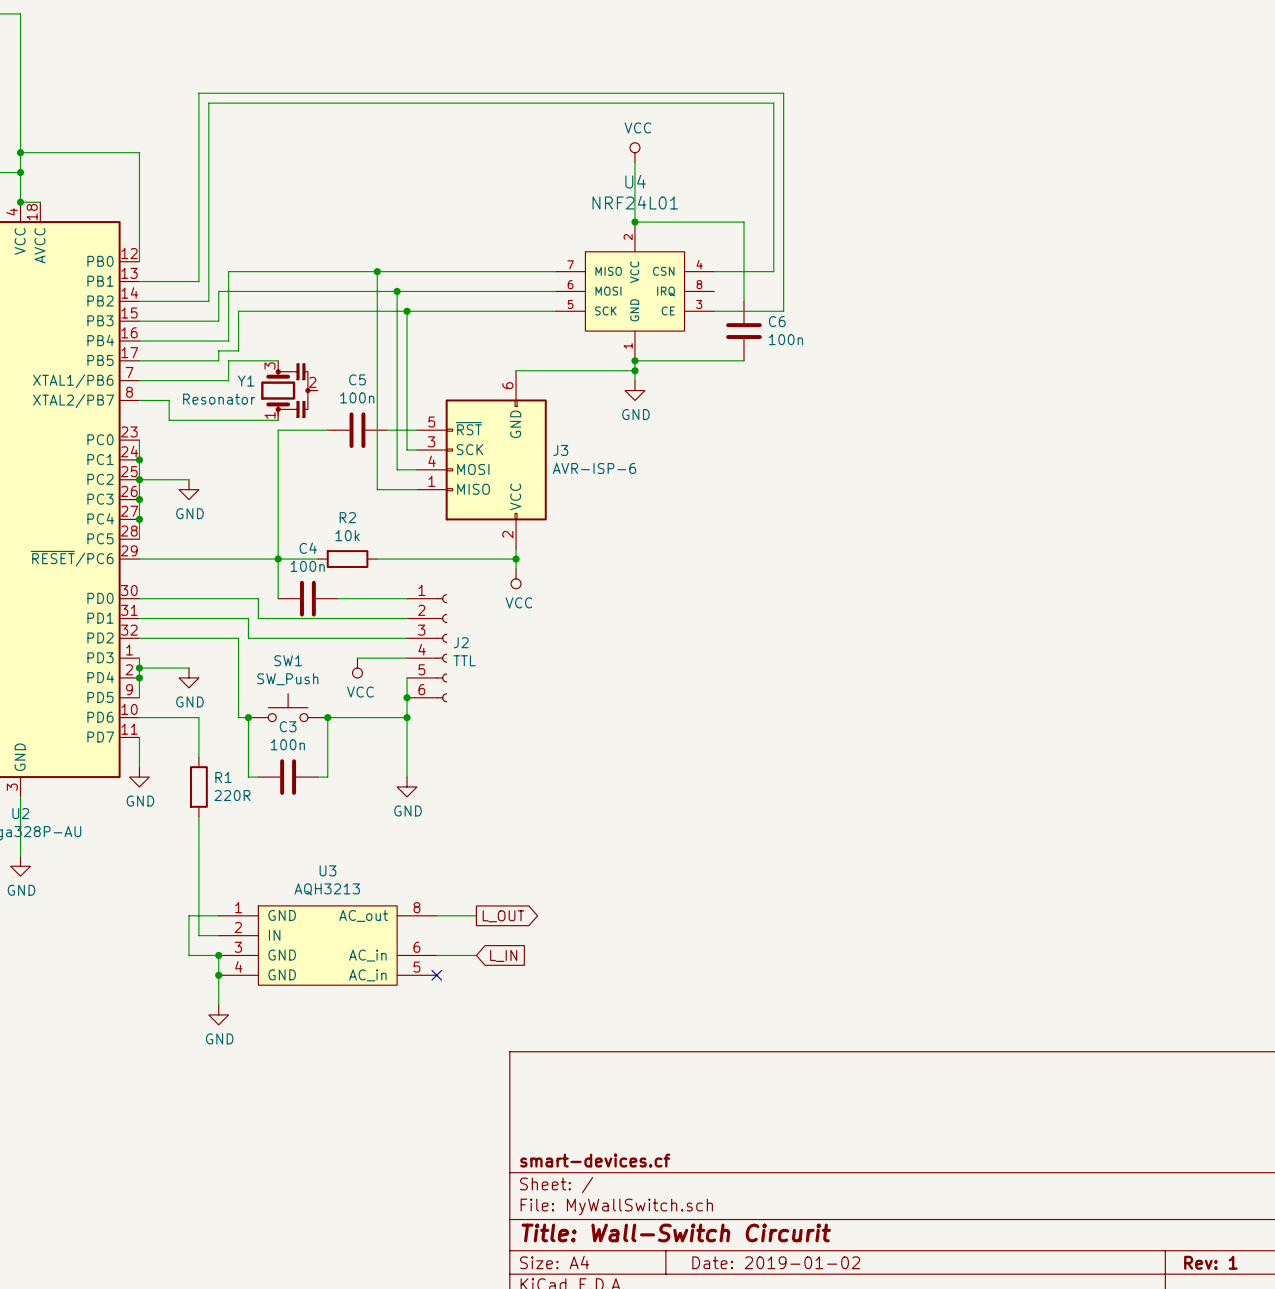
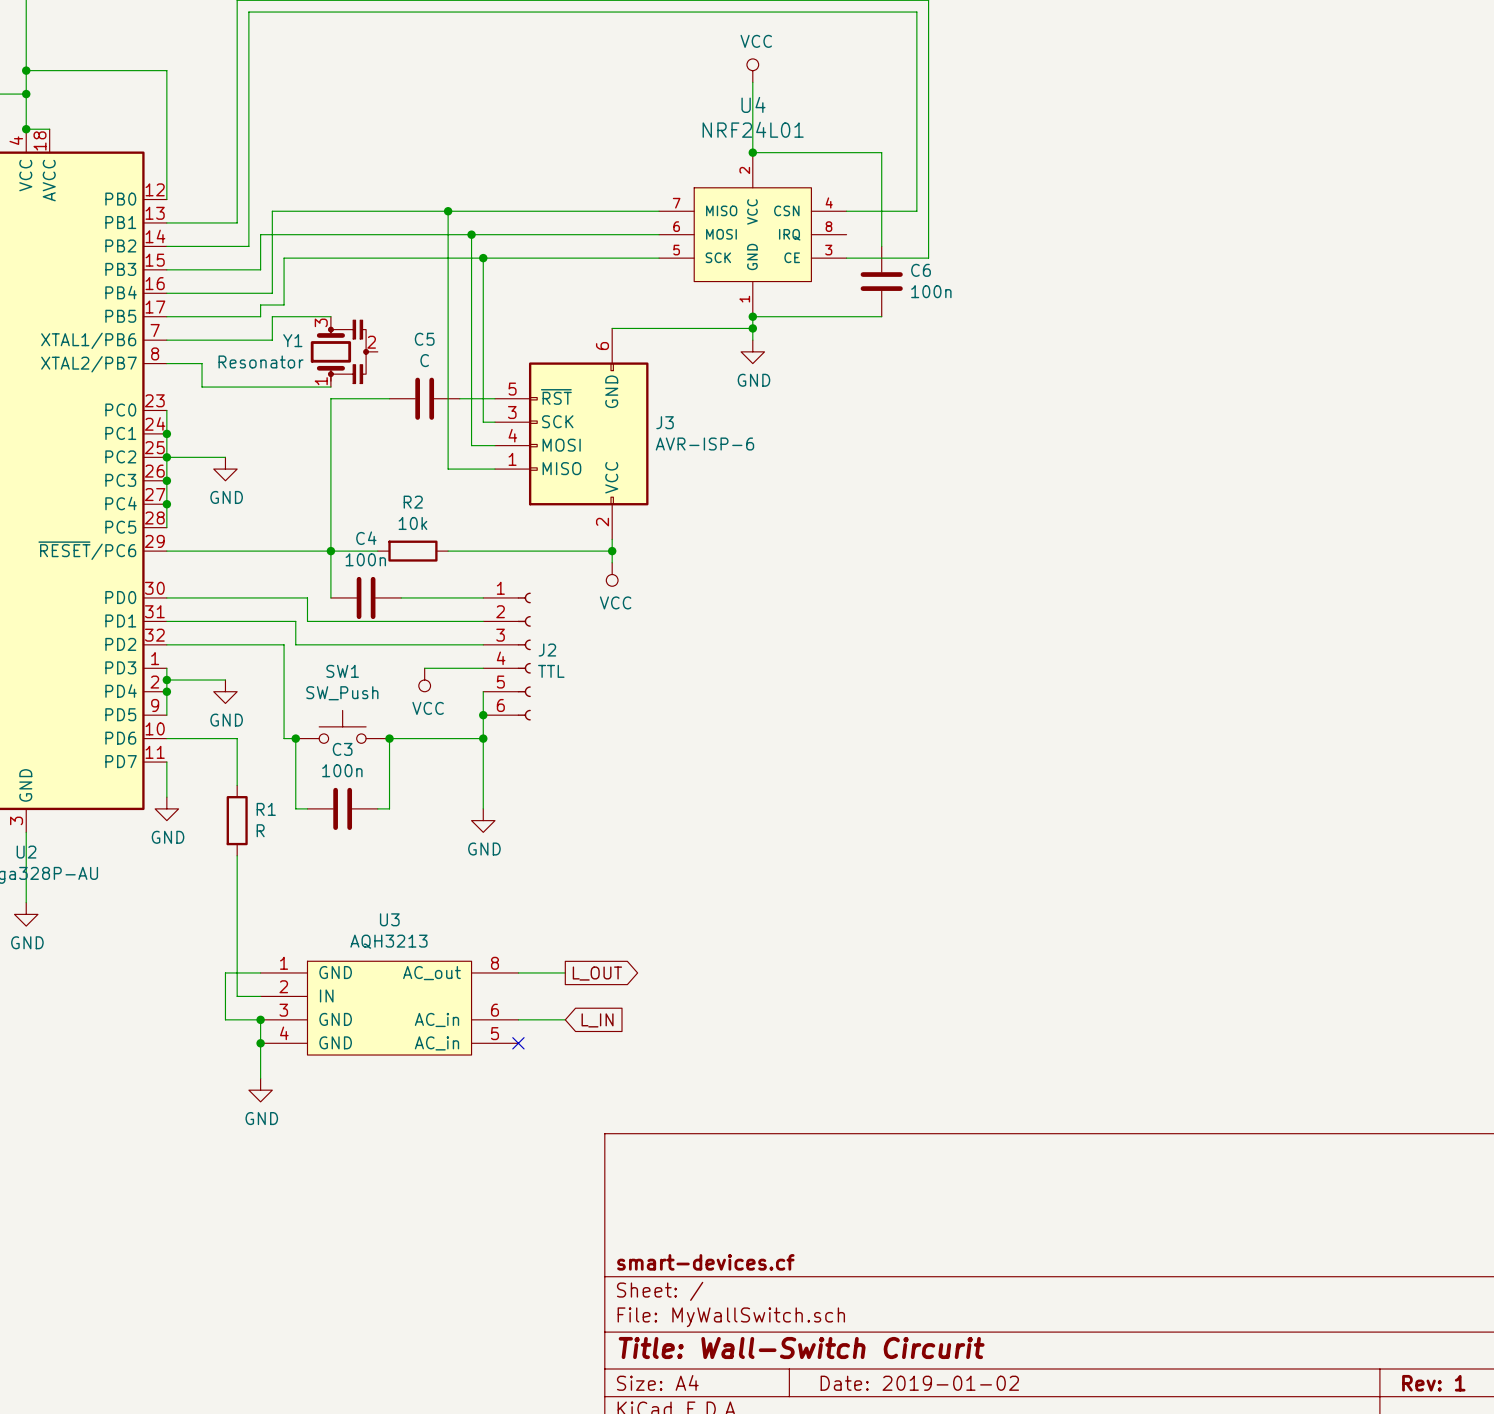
C5 value: 100n (357, 397) -> C (424, 360)
R1 value: 220R (232, 795) -> R (260, 830)

